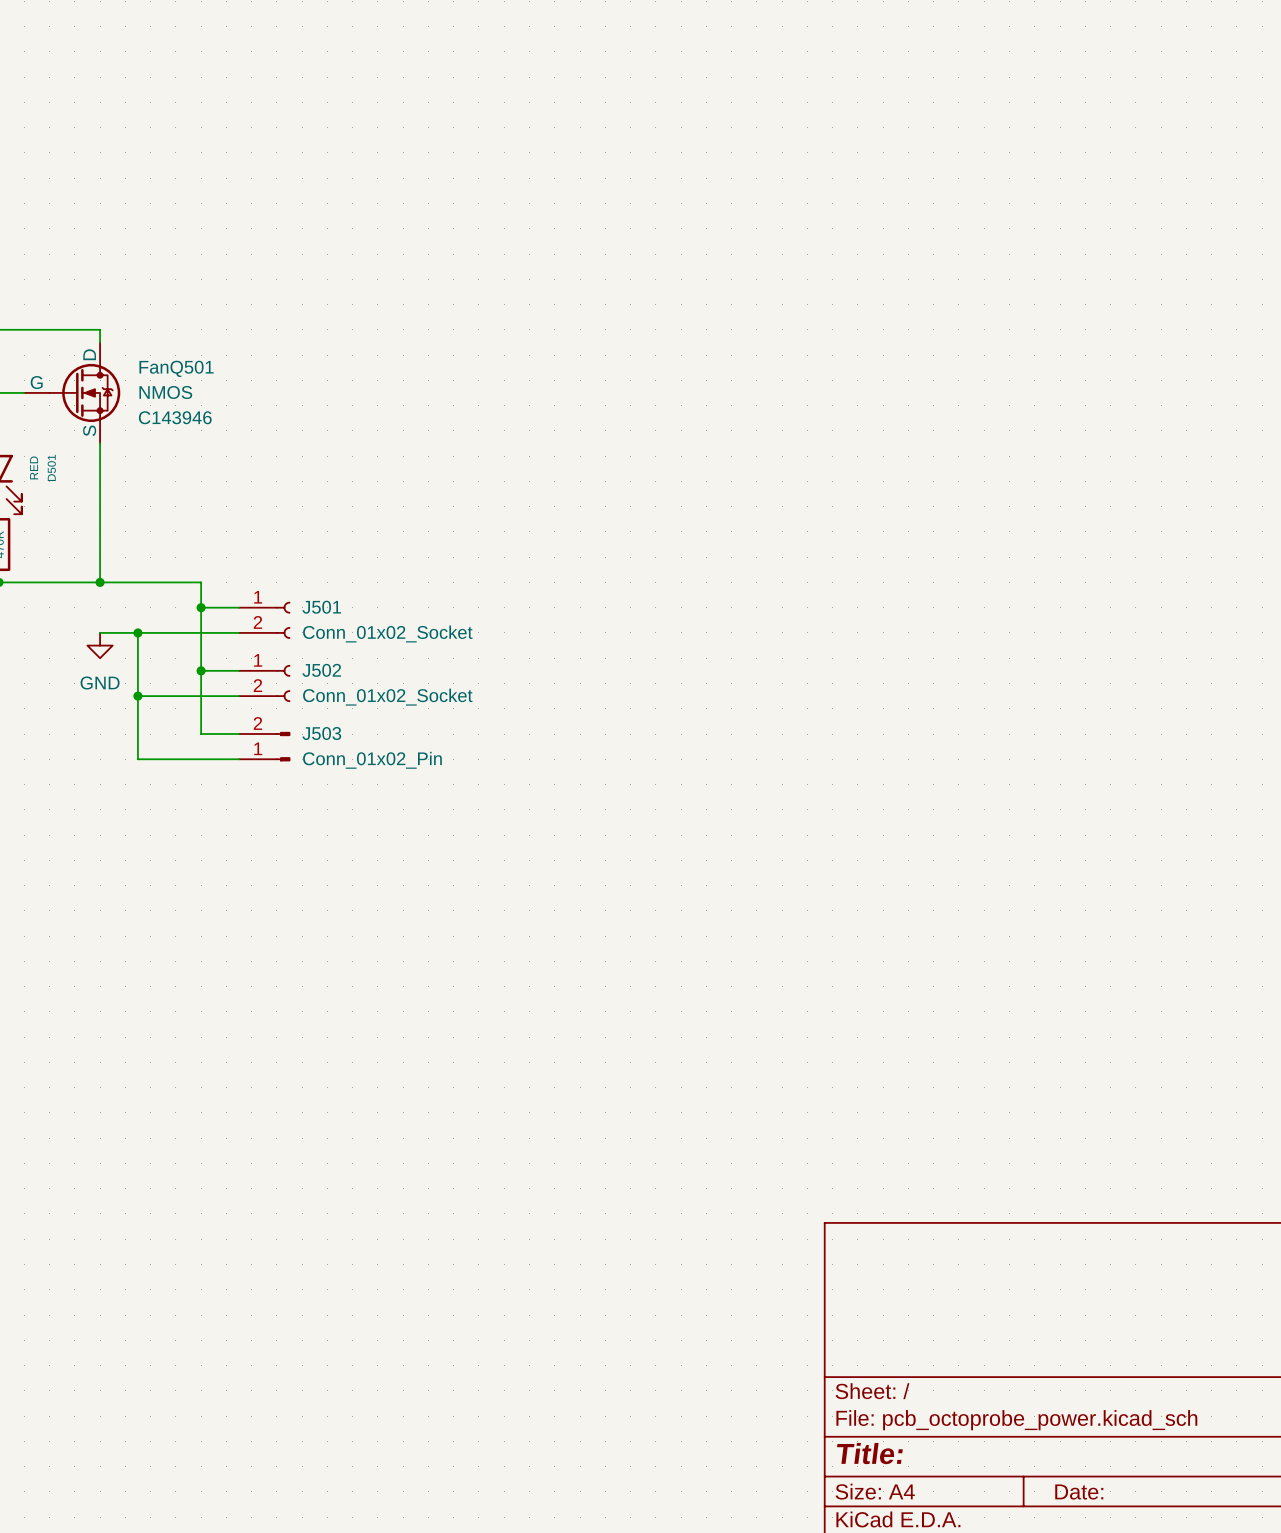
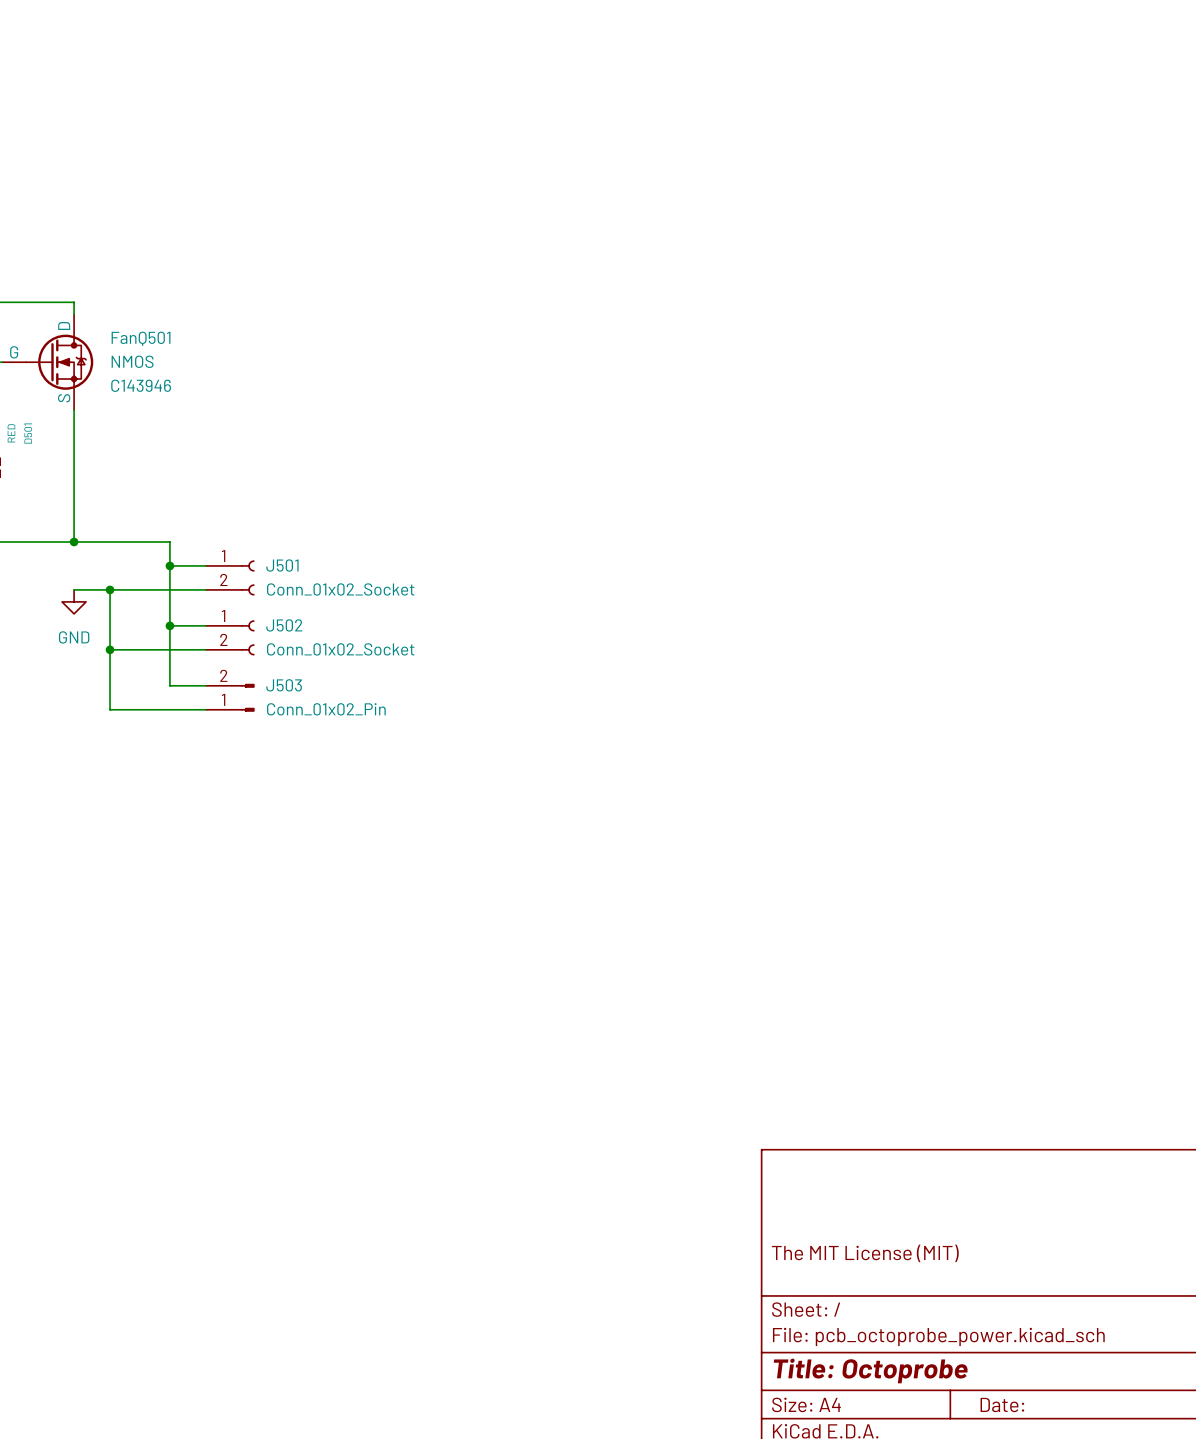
title block: none -> The MIT License (MIT) (865, 1253)
title block: Title: (869, 1453) -> Title: Octoprobe (870, 1370)

